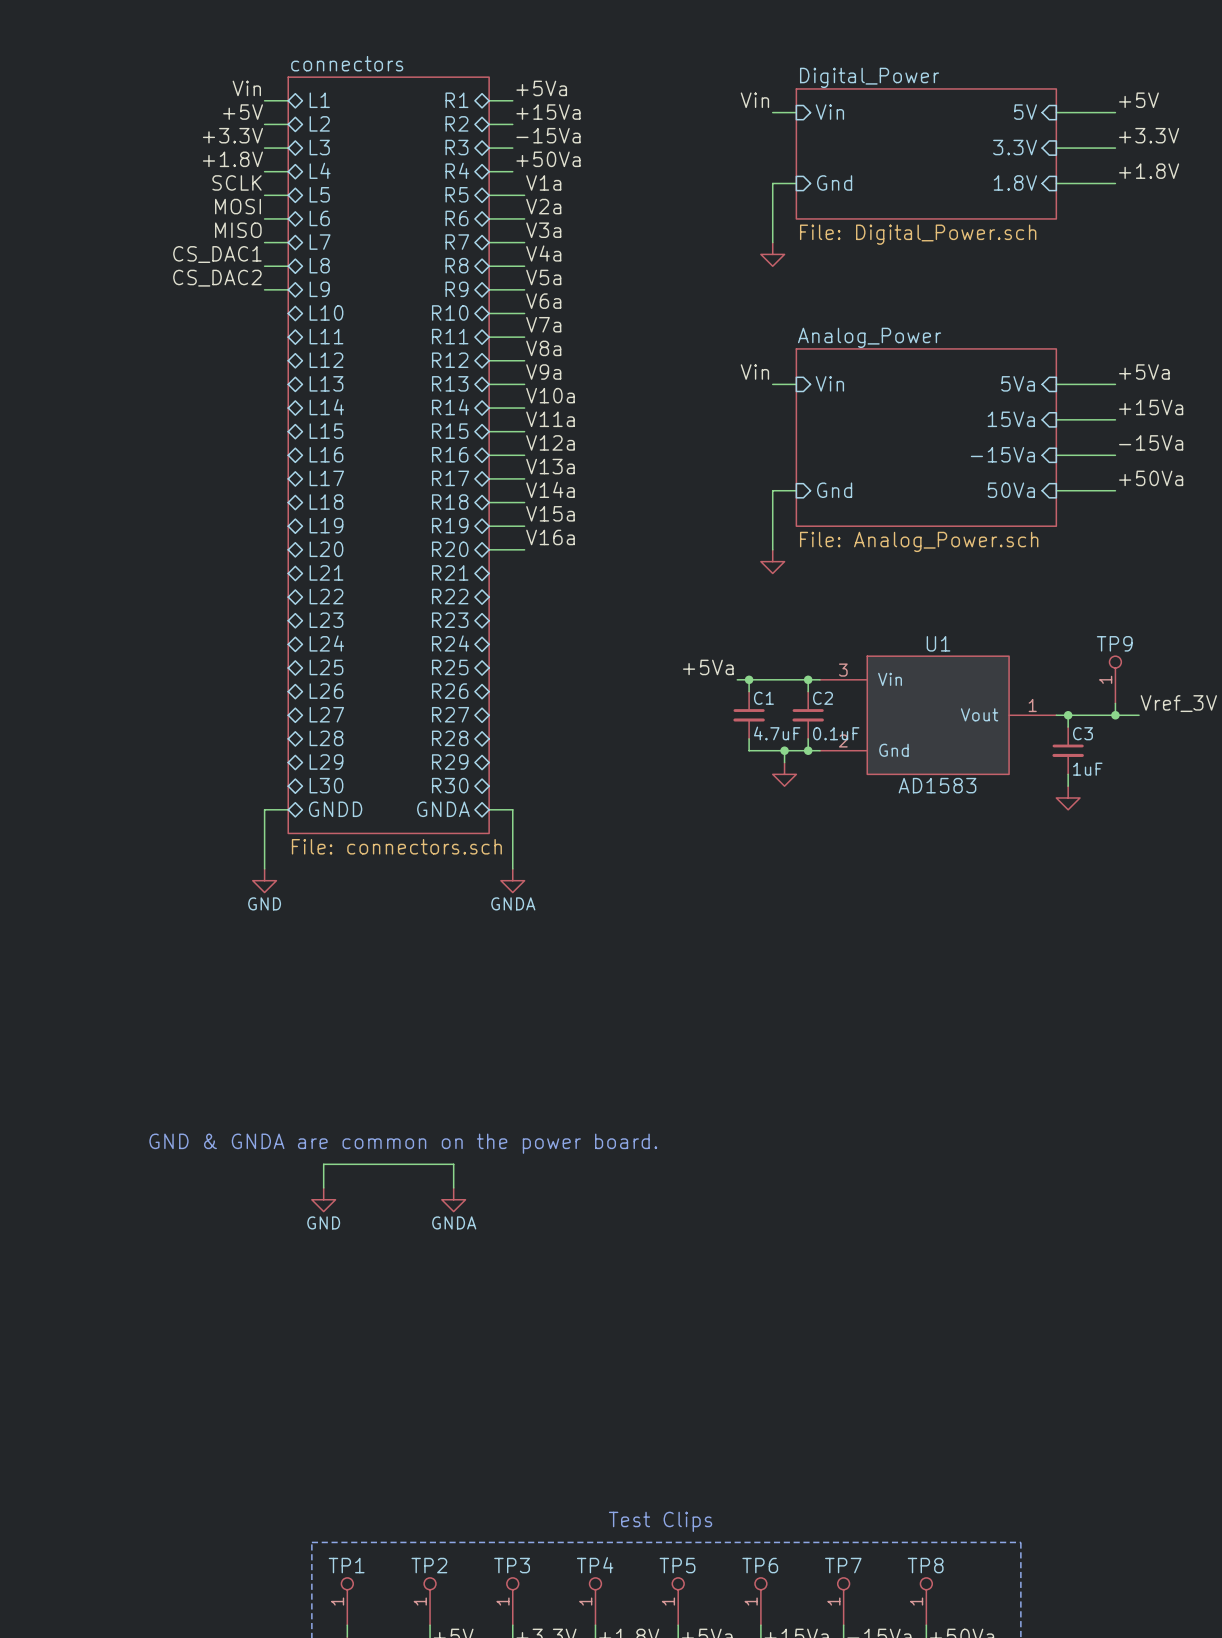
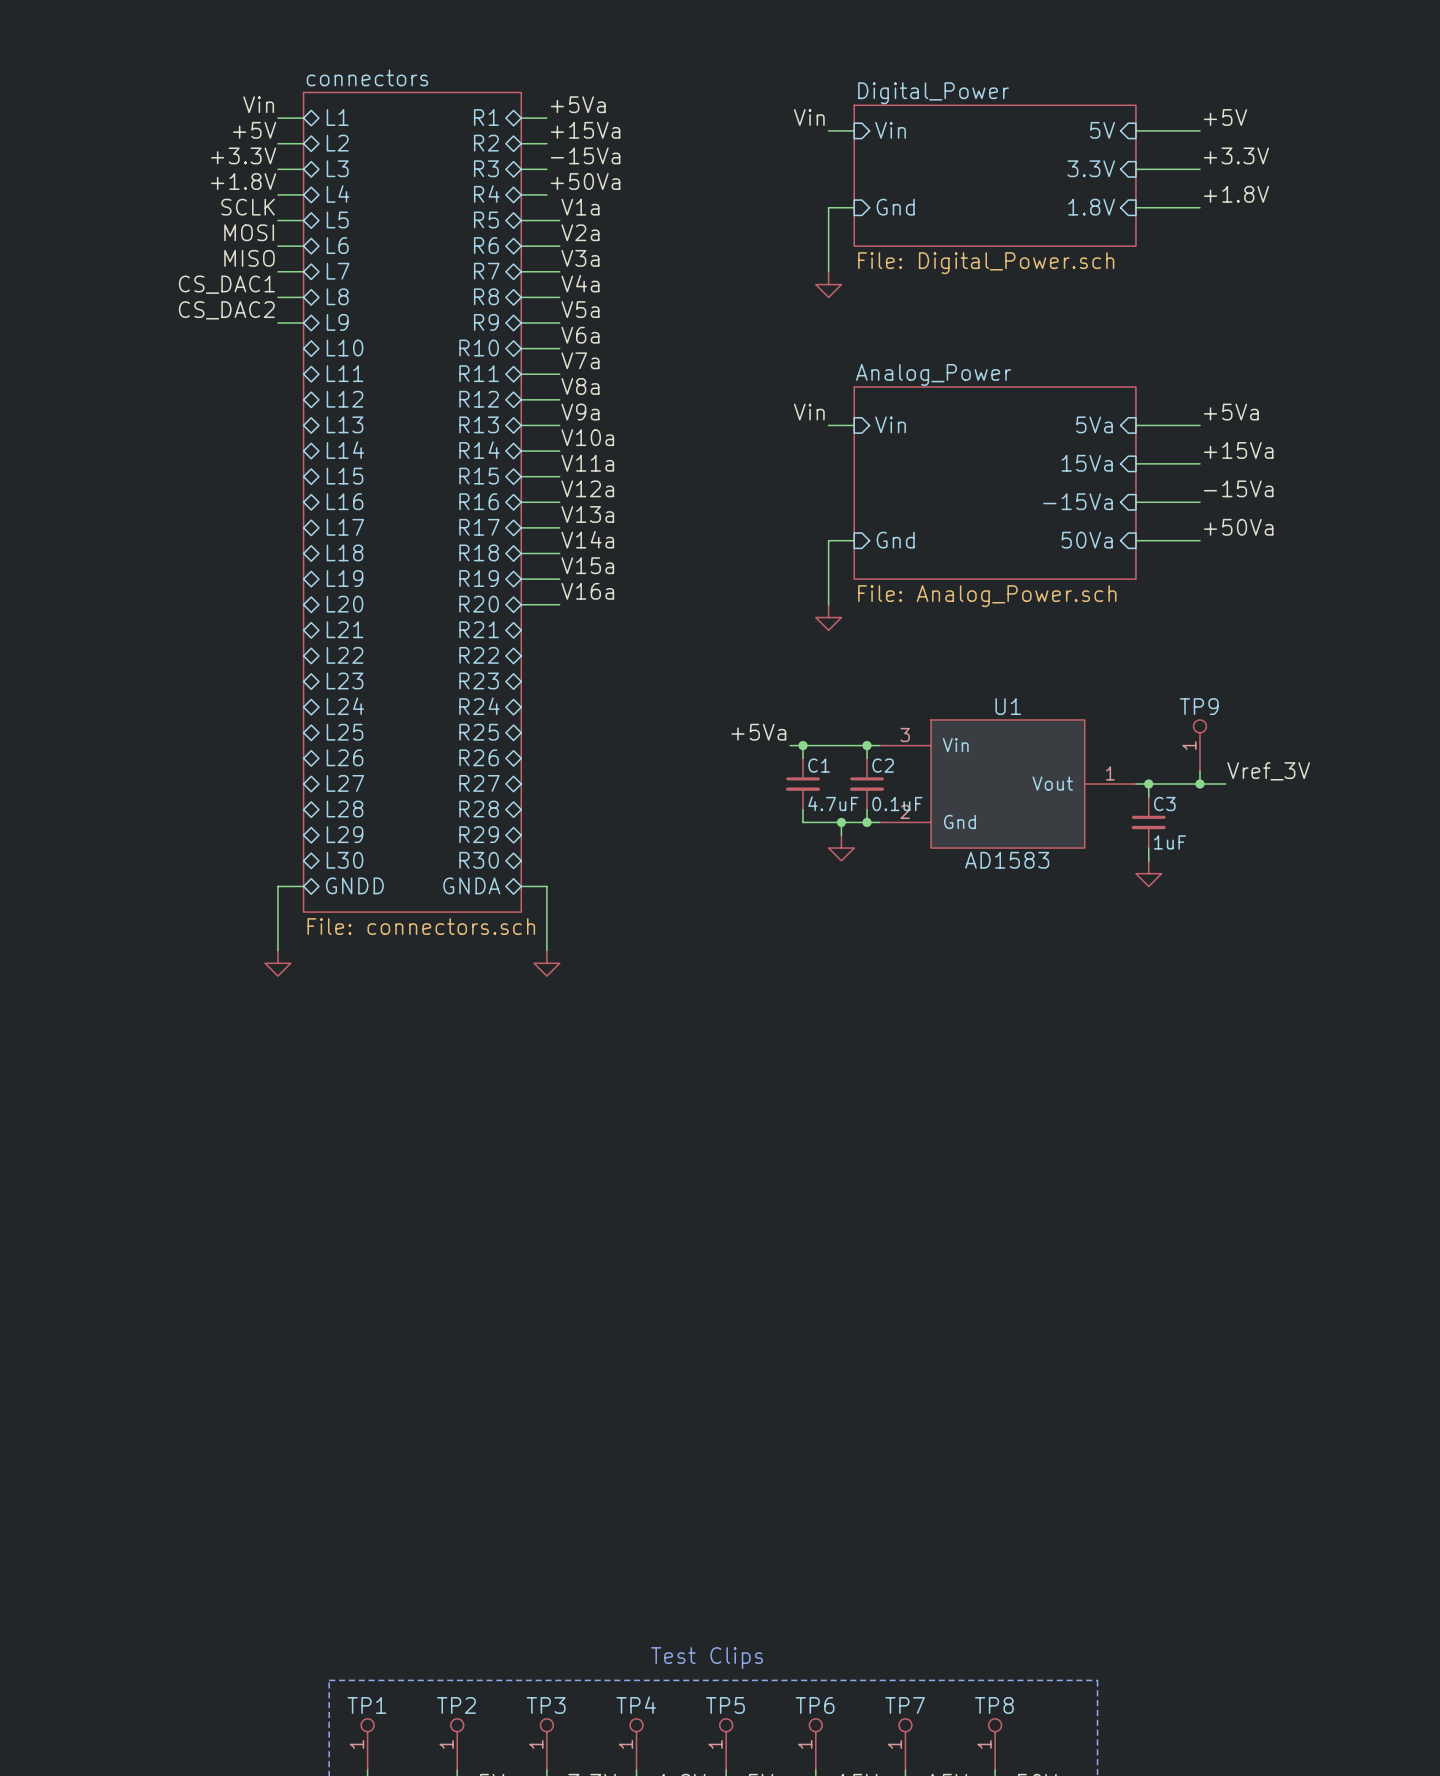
power symbol text: GND (264, 903) -> none
power symbol text: GNDA (513, 903) -> none
text: GND & GNDA are common on the power board. (403, 1143) -> none
wire: (323, 1187) (323, 1164) (453, 1164) (453, 1187) -> none
power symbol: GND (323, 1199) -> none
power symbol: GNDA (453, 1199) -> none

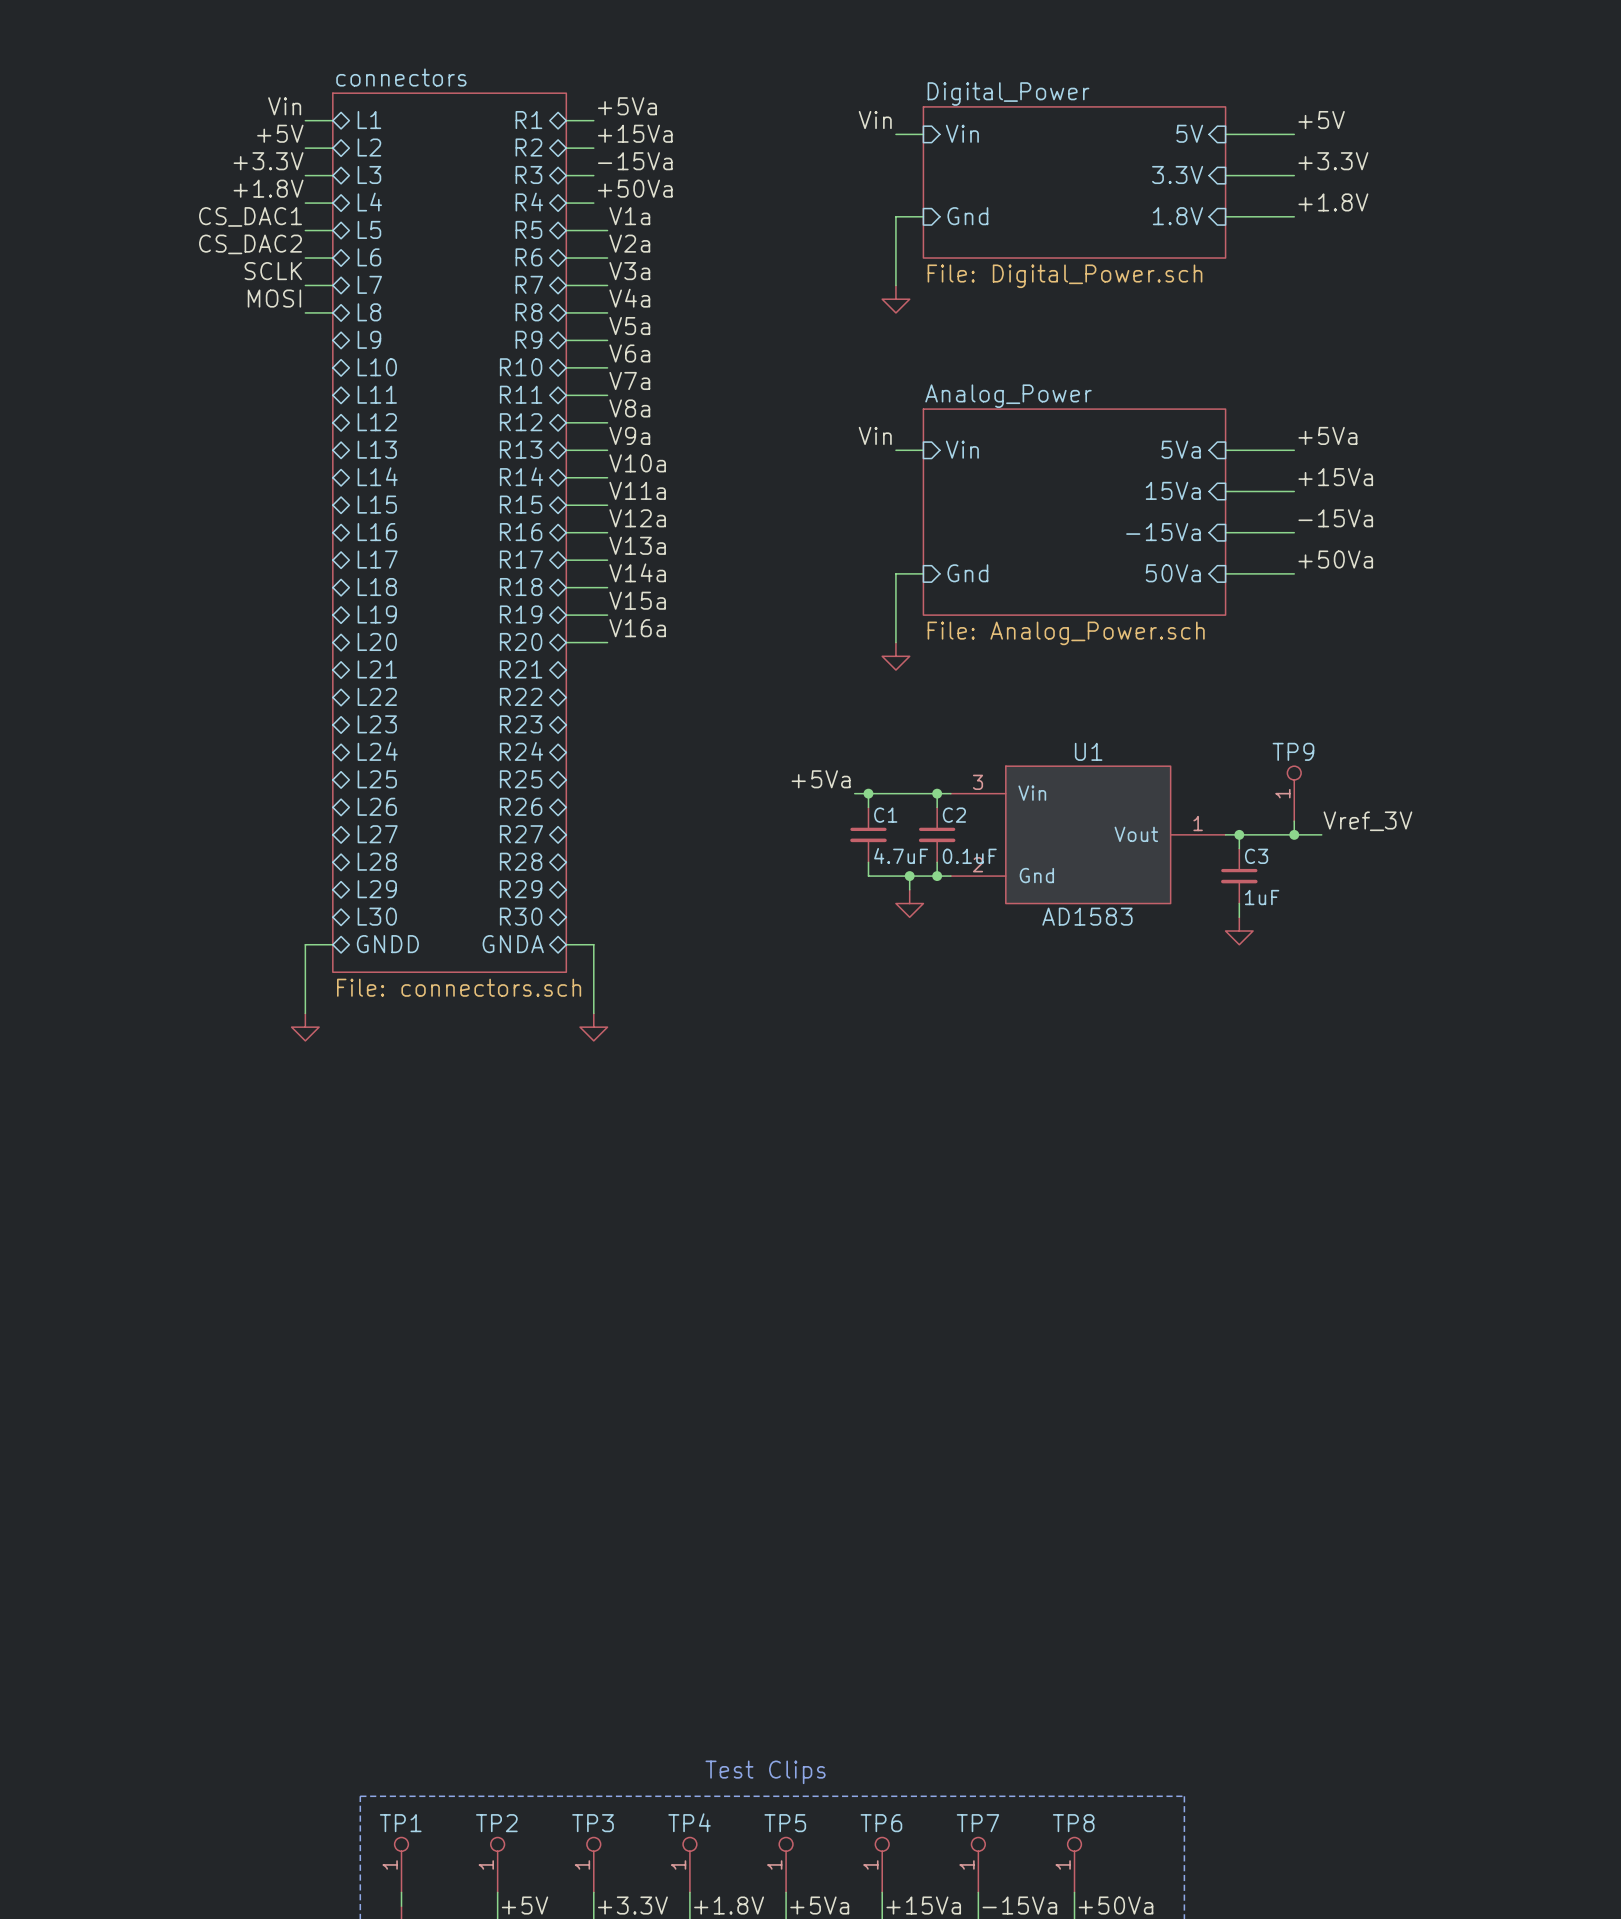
label: SCLK (248, 207) -> CS_DAC1 (250, 216)
label: MOSI (249, 232) -> CS_DAC2 (250, 244)
label: MISO (249, 258) -> SCLK (273, 271)
label: CS_DAC1 (226, 284) -> MOSI (274, 298)
label: CS_DAC2 (226, 310) -> none
wire: (277, 323) (303, 323) -> none

